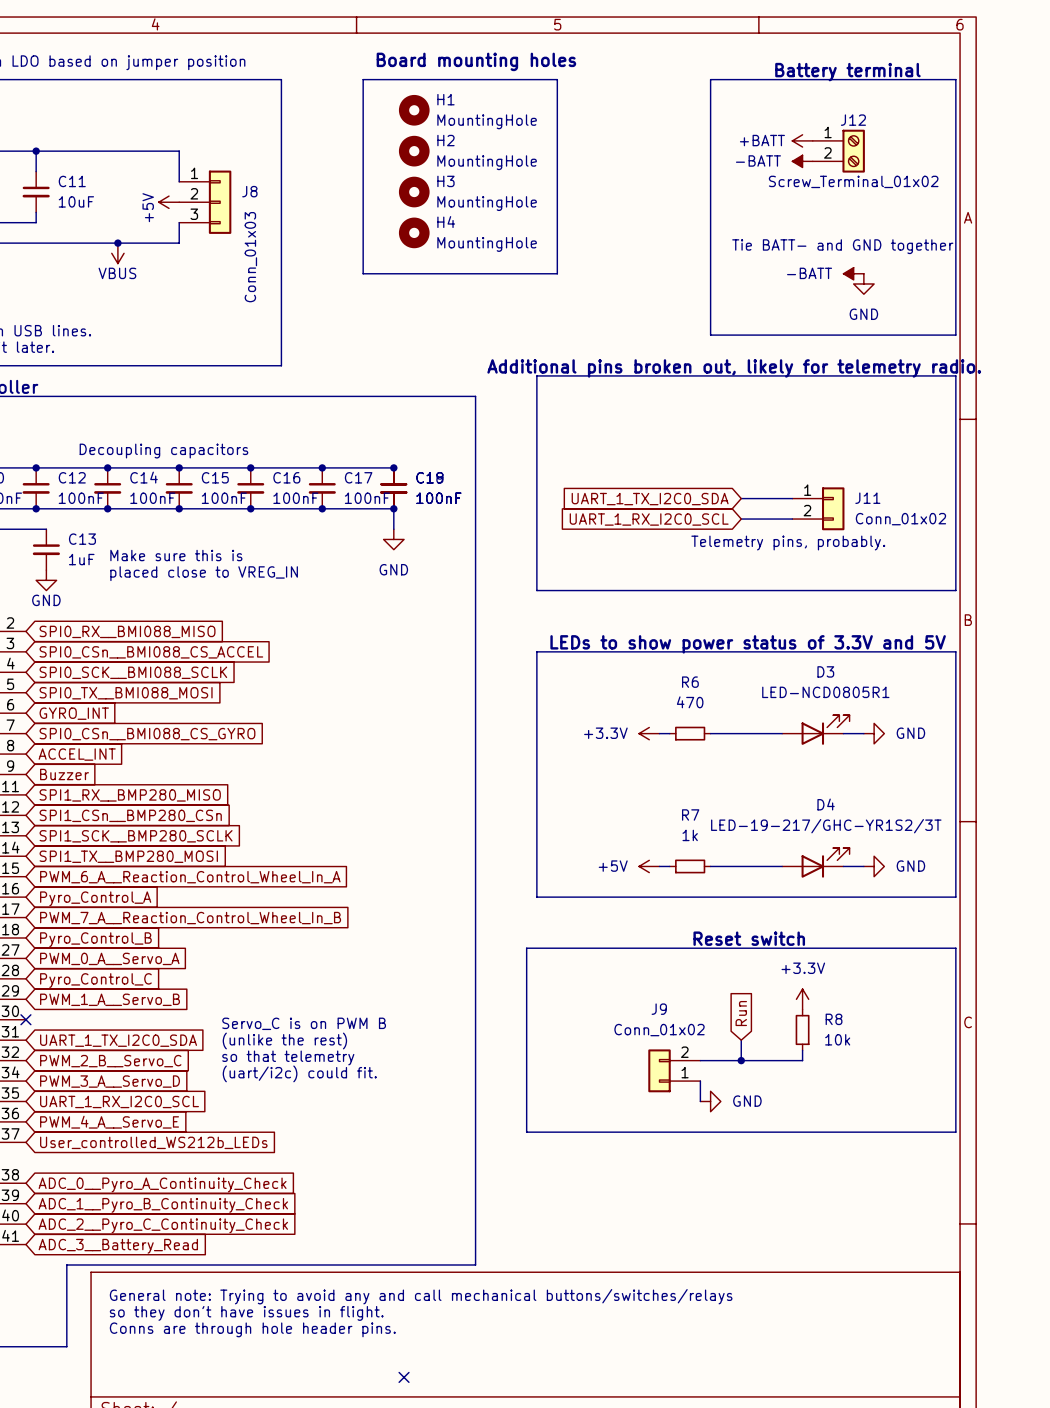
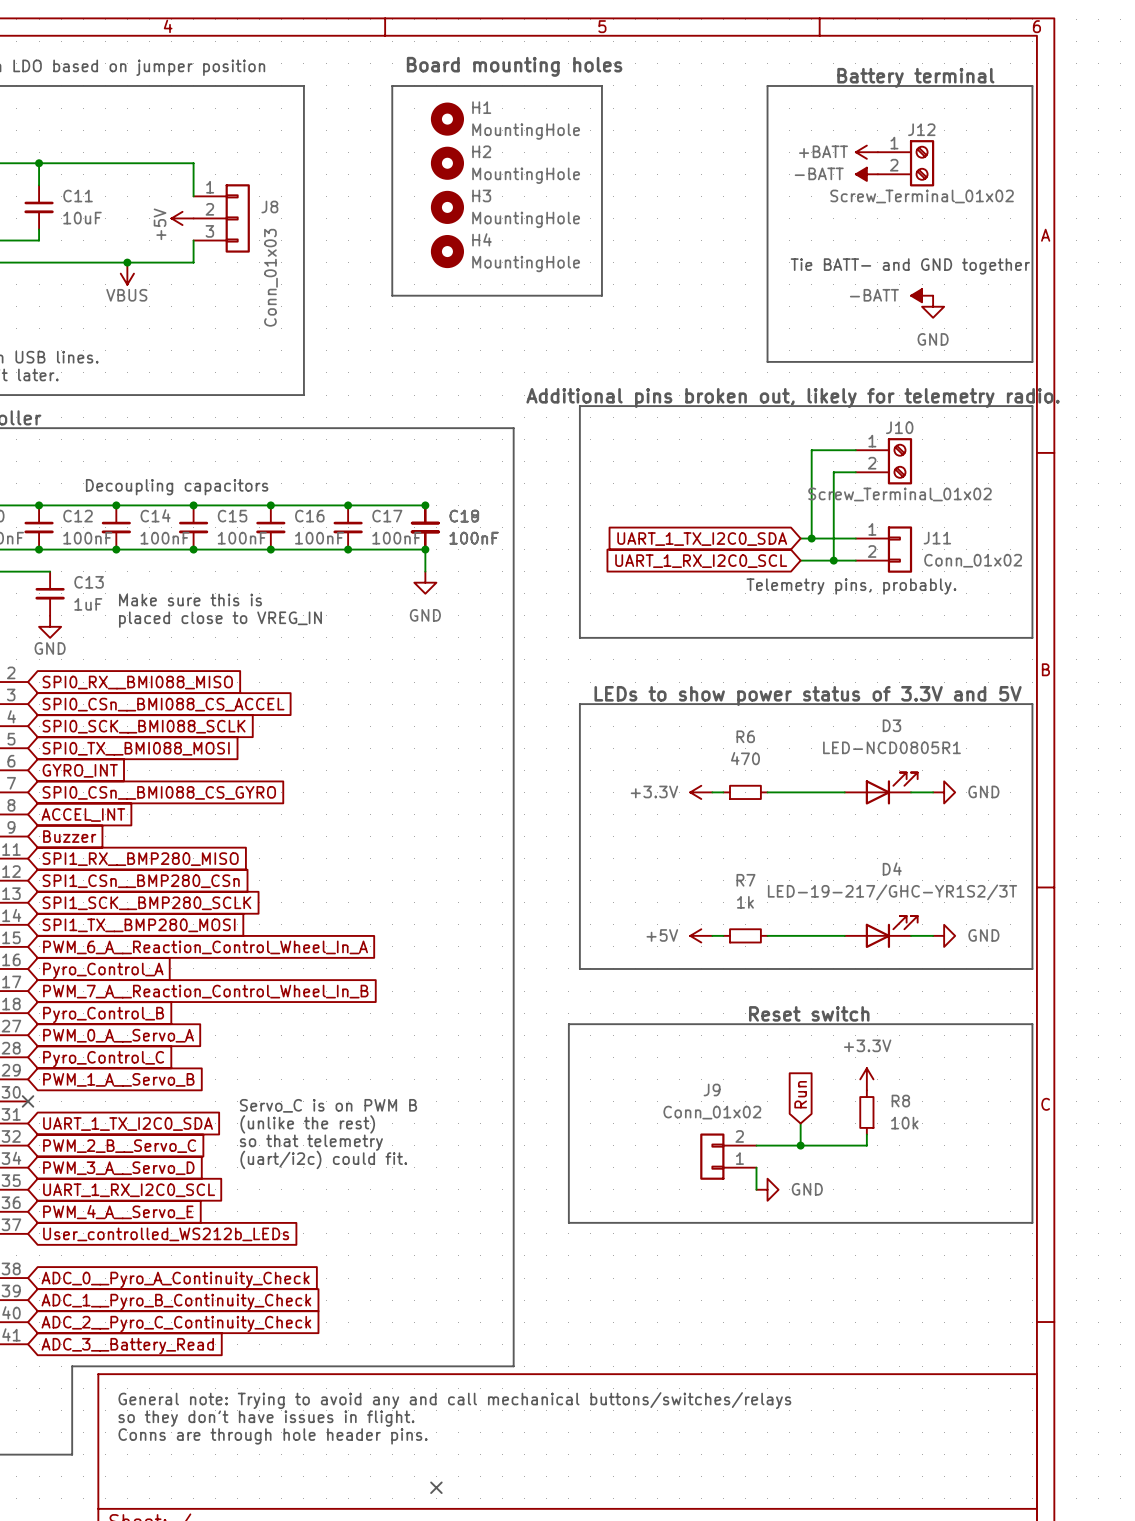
wire: none -> (855, 450) (811, 450) (811, 538)
J10: none -> Screw_Terminal_01x02 (883, 461)
wire: none -> (855, 472) (833, 472) (833, 560)
junction: none -> (811, 538)
junction: none -> (833, 560)

